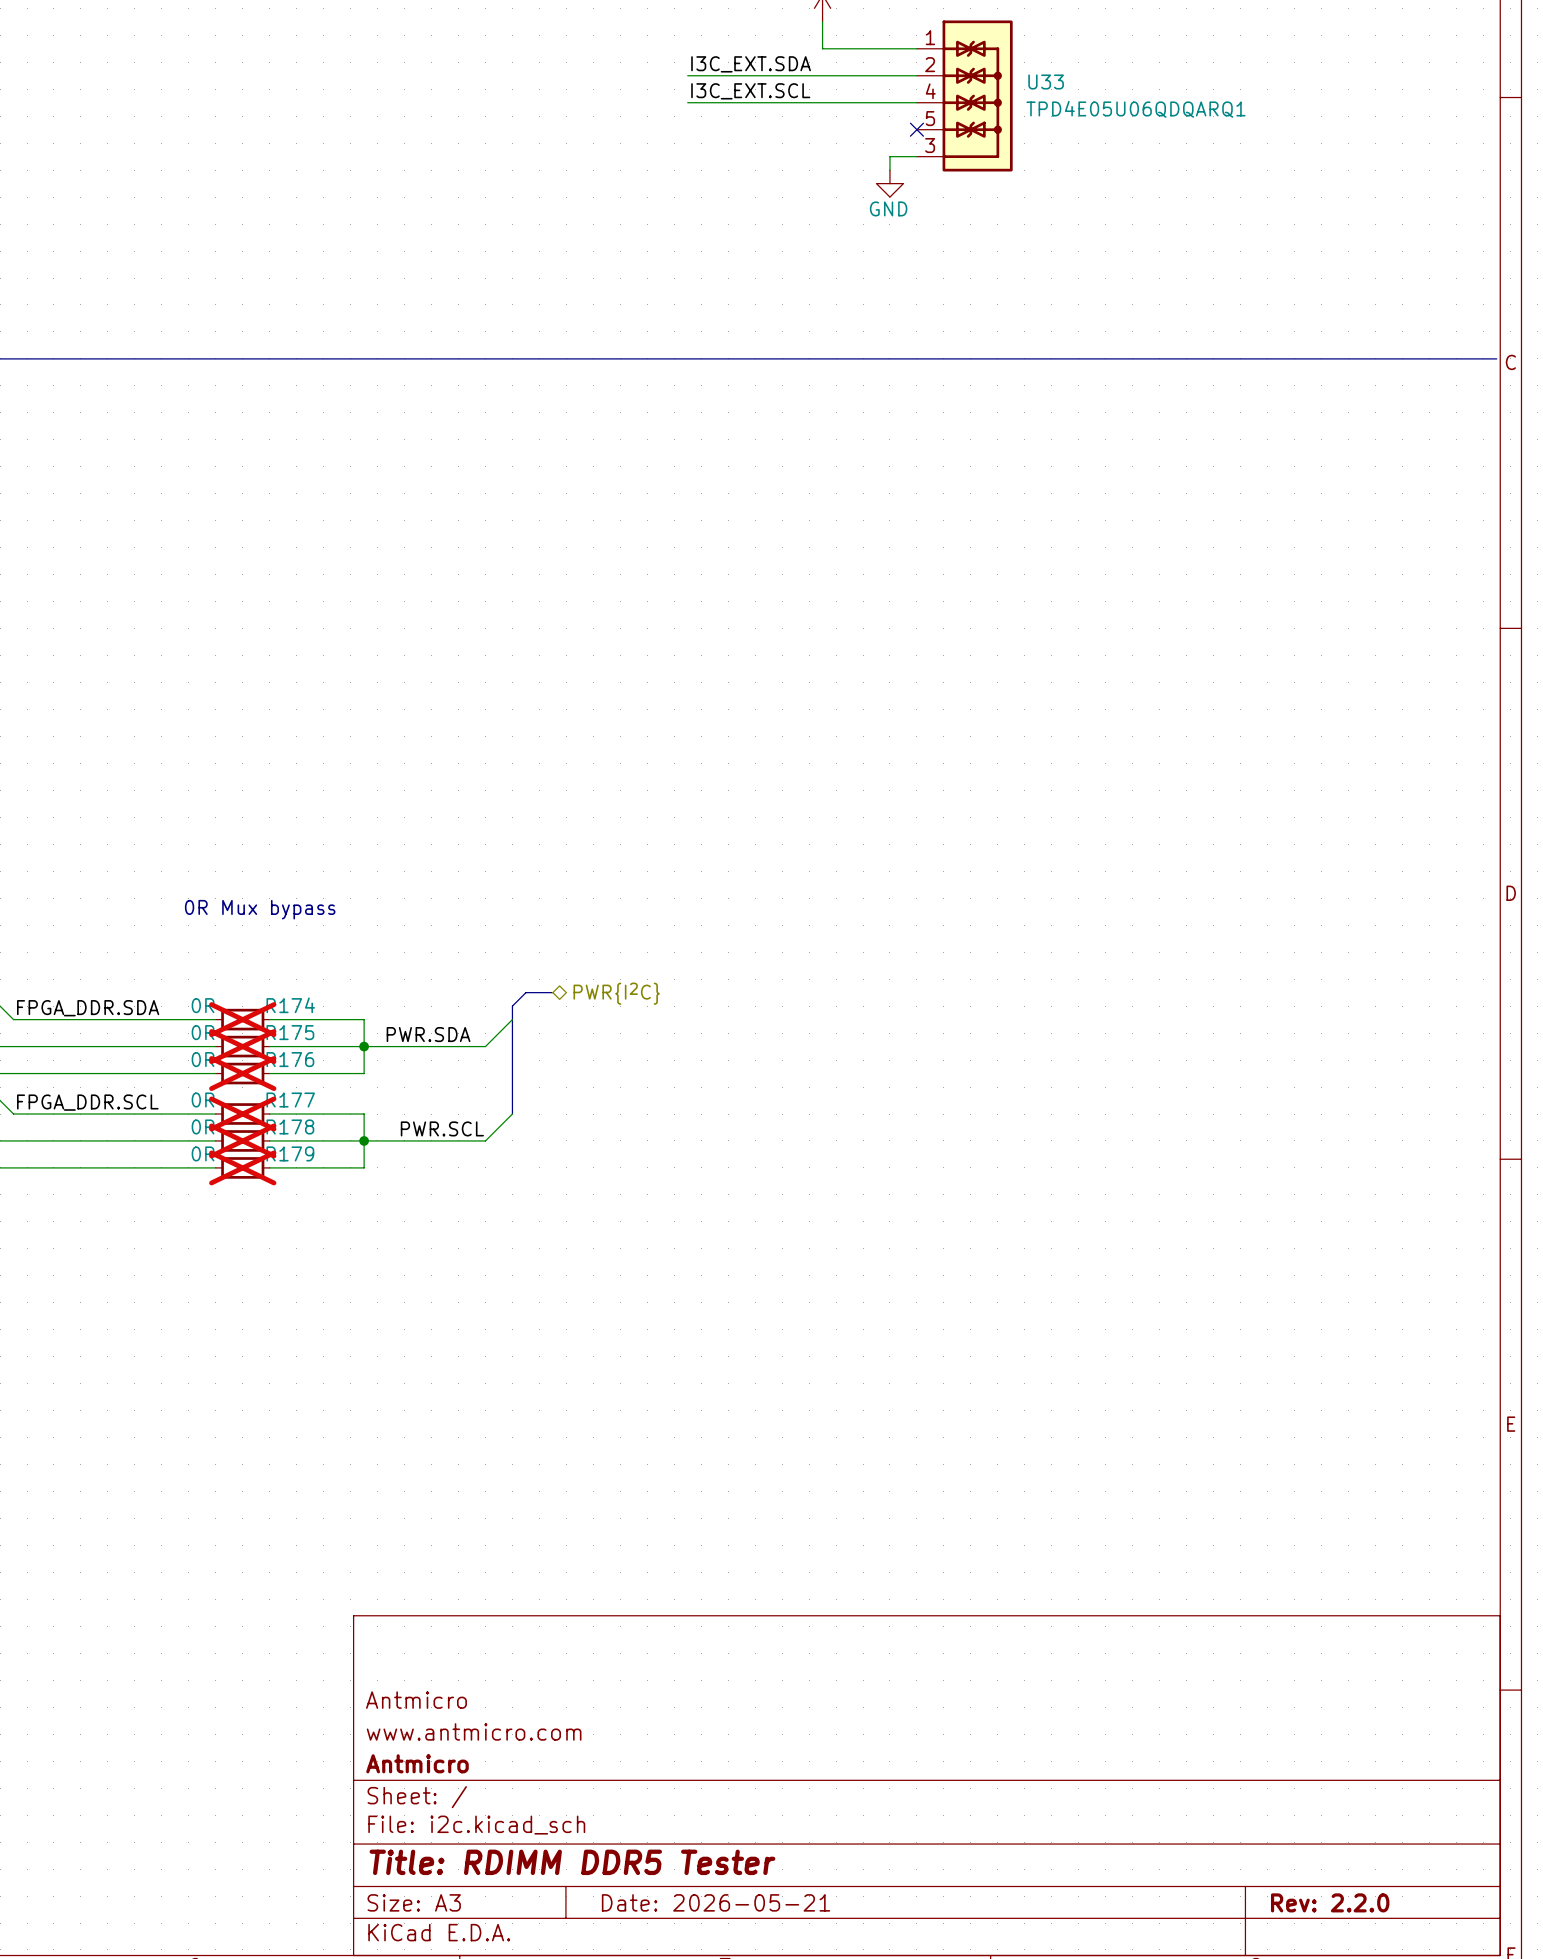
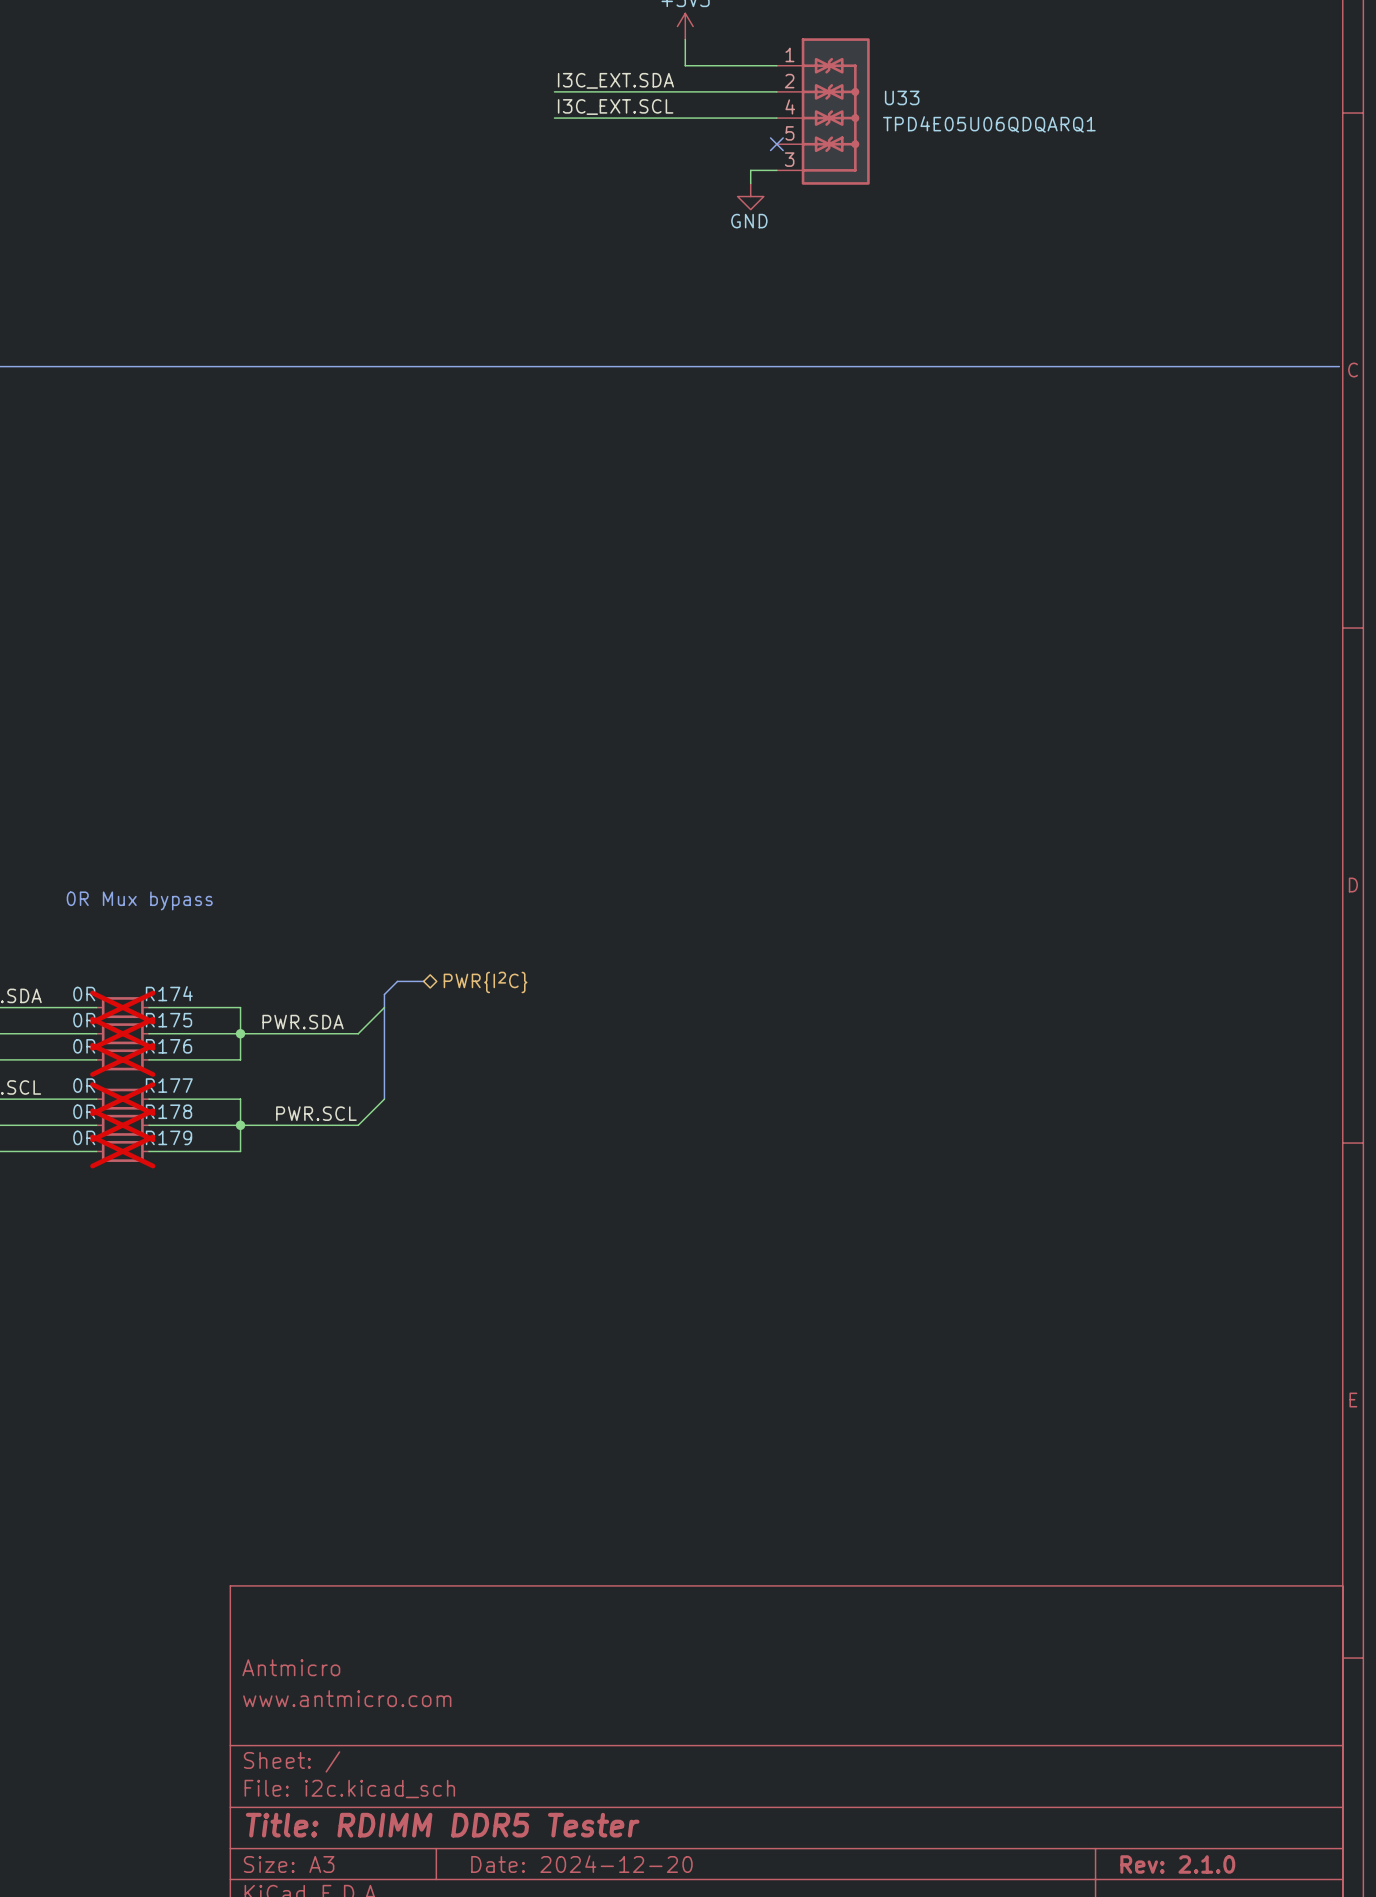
title block: Antmicro (417, 1763) -> none
title block: Date: 2026-05-21 (716, 1902) -> Date: 2024-12-20 (581, 1864)
title block: Rev: 2.2.0 (1330, 1902) -> Rev: 2.1.0 (1177, 1864)

